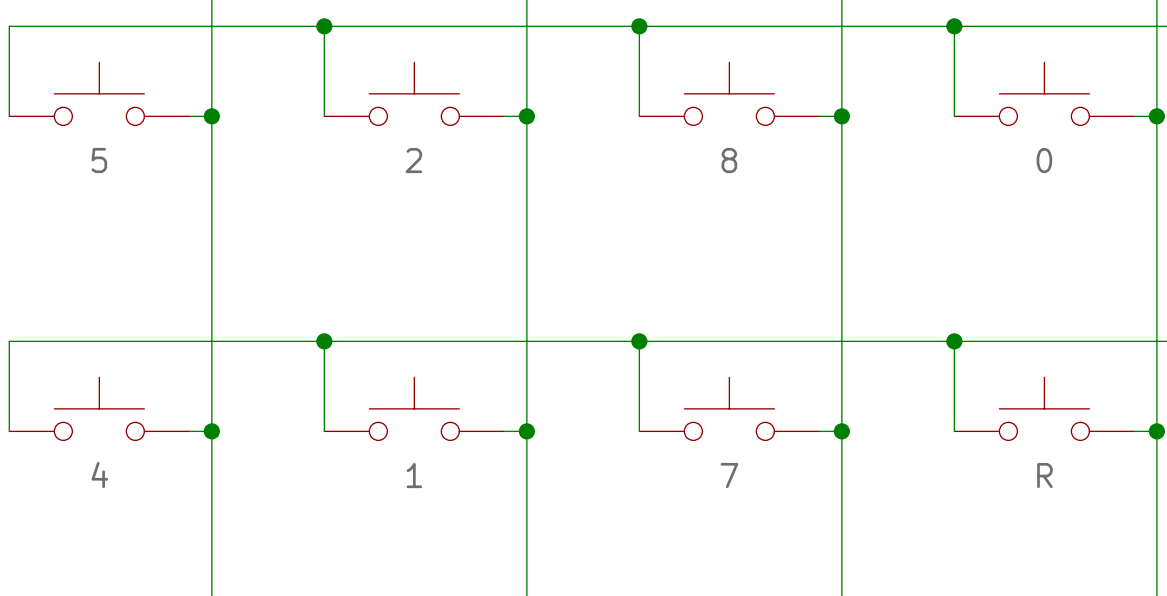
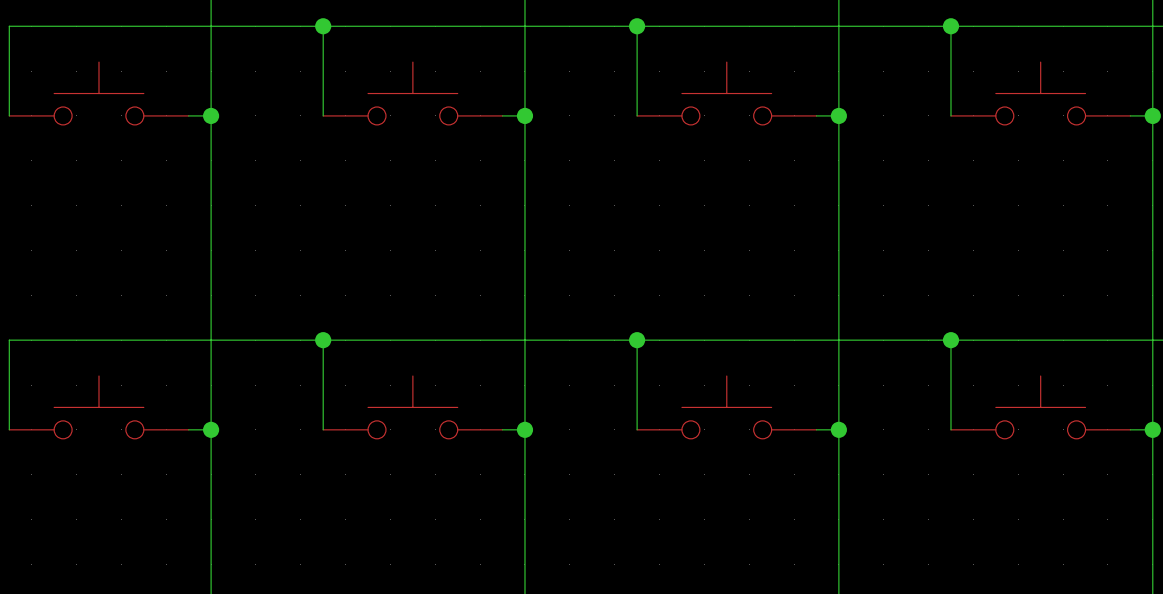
part value: 5 (99, 160) -> none
part value: 2 (413, 160) -> none
part value: 8 (729, 160) -> none
part value: 0 (1044, 160) -> none
part value: 4 (99, 474) -> none
part value: 1 (414, 475) -> none
part value: 7 (729, 475) -> none
part value: R (1044, 475) -> none

